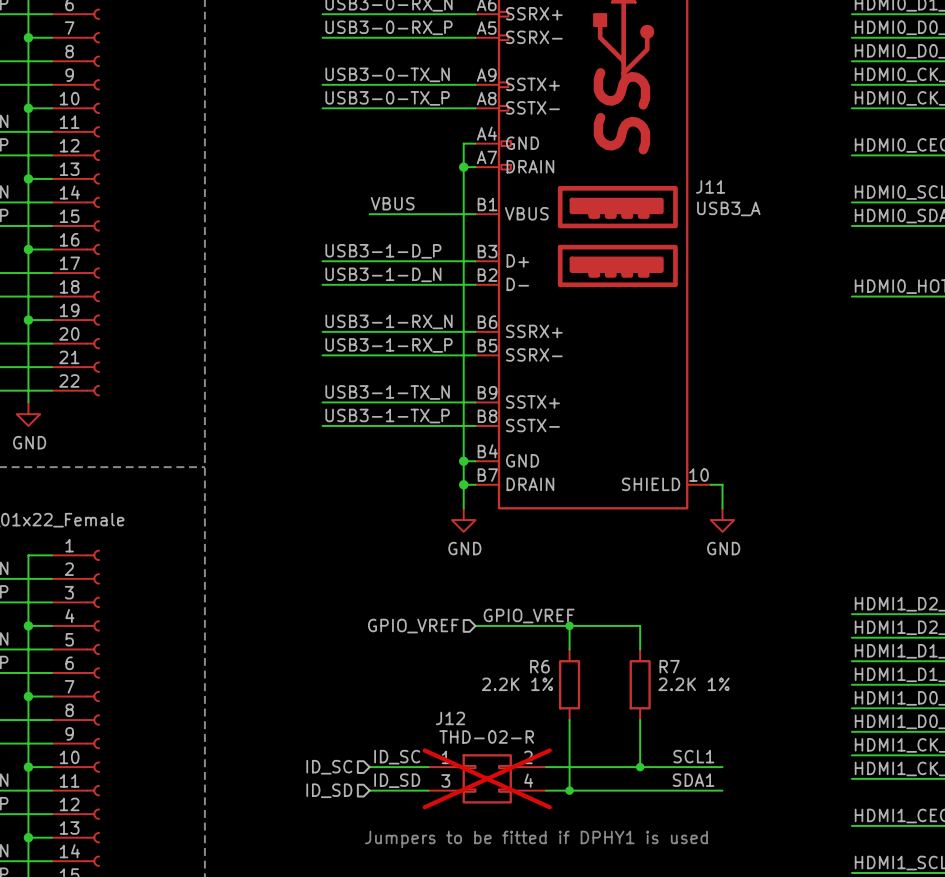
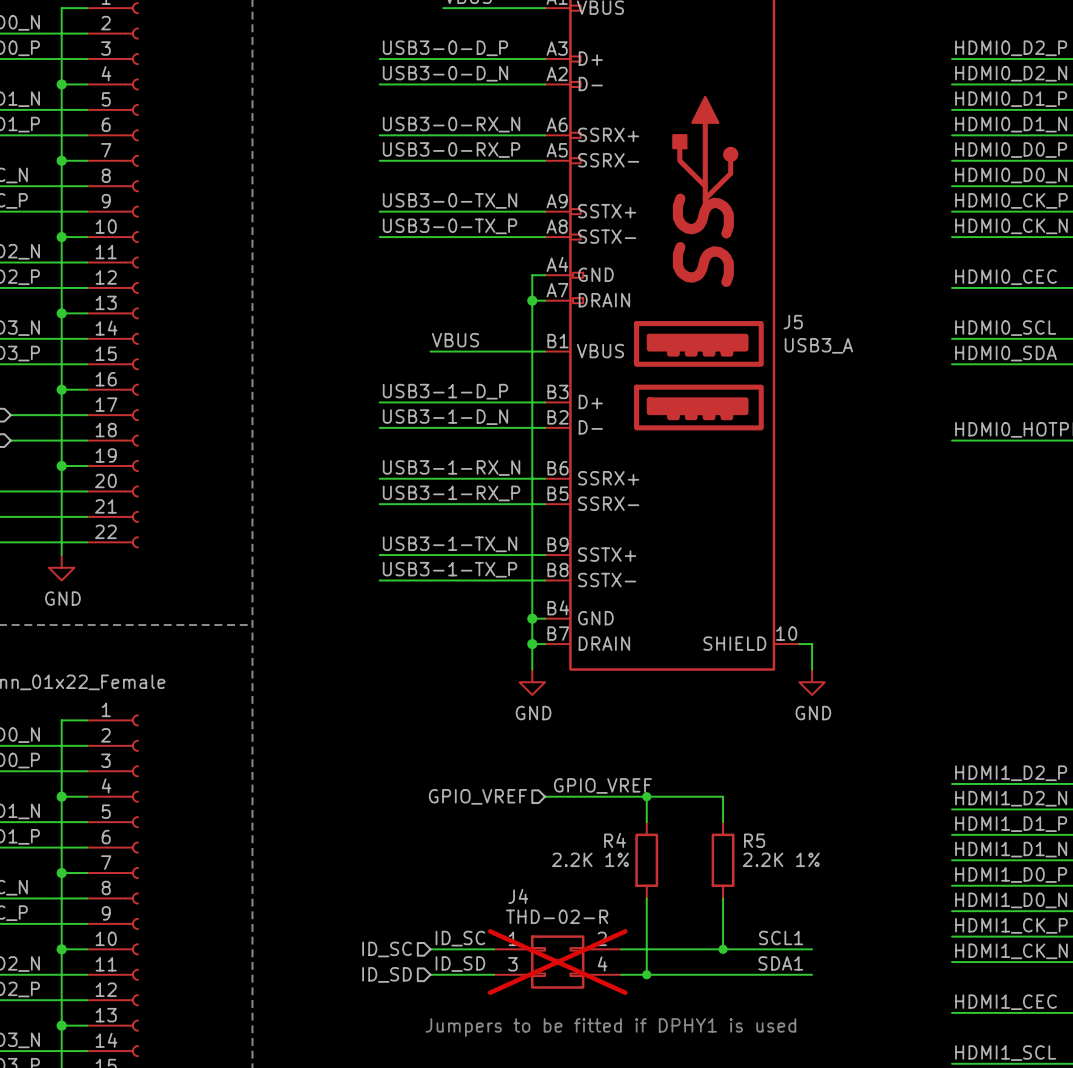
J11 name: J11 (710, 186) -> J5 (793, 322)
R6 name: R6 (539, 666) -> R4 (615, 840)
R7 name: R7 (669, 666) -> R5 (754, 840)
J12 name: J12 (450, 718) -> J4 (518, 896)

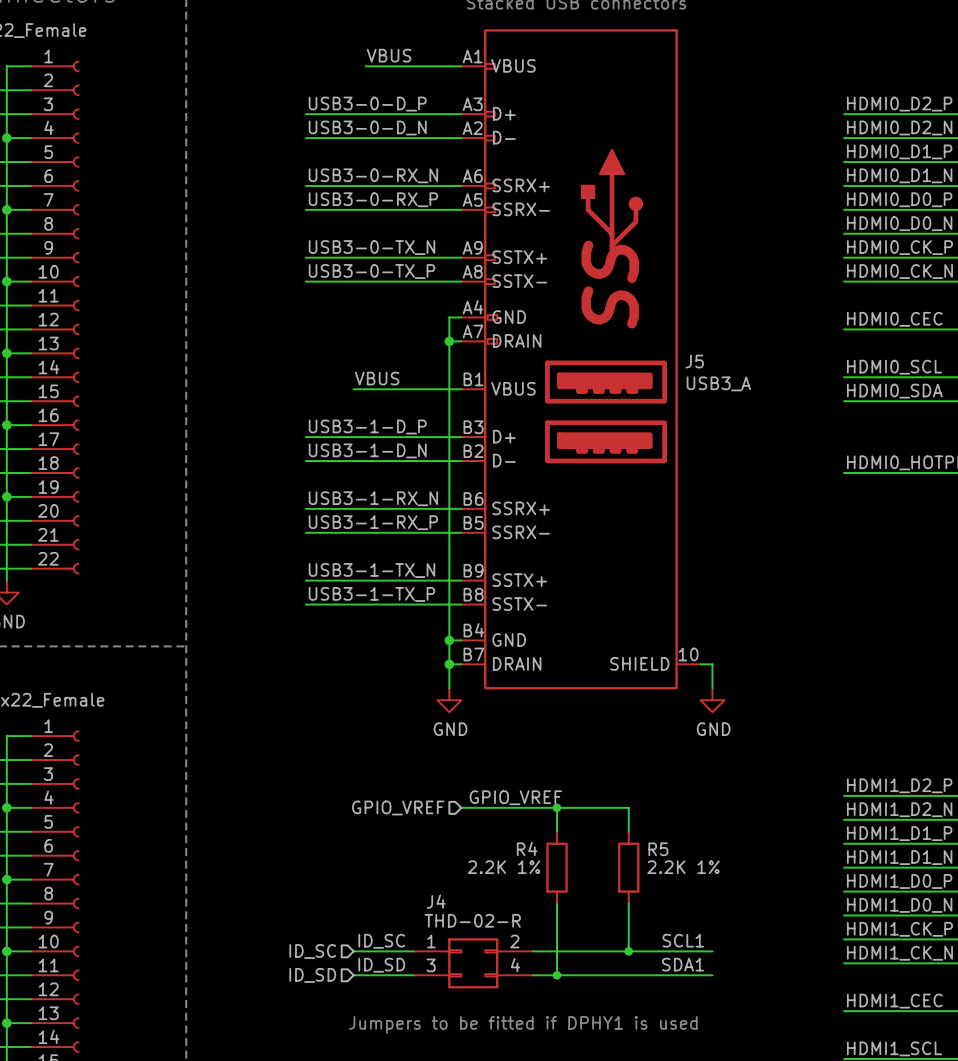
J4 do-not-place cross: (557, 962) -> none

